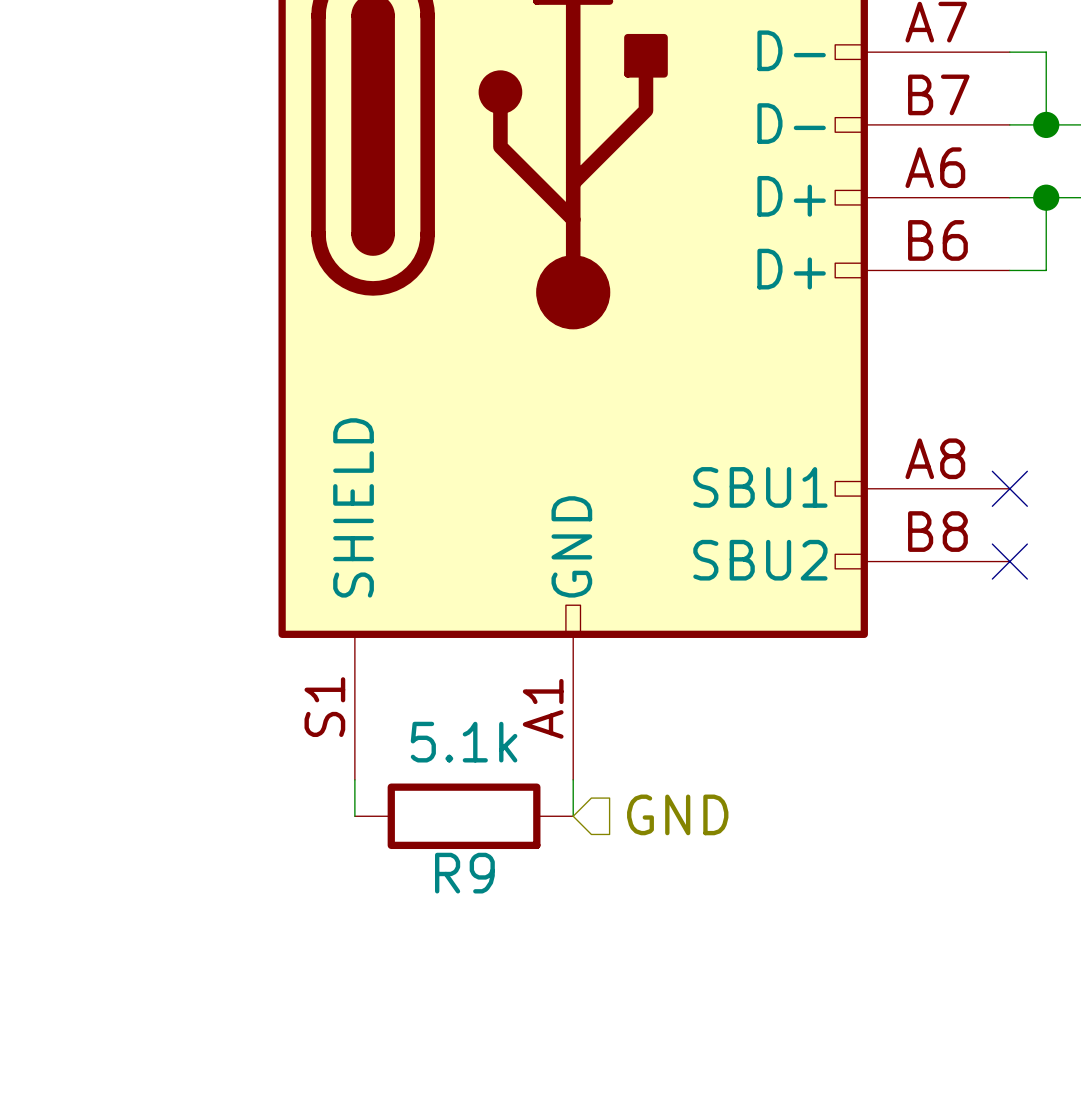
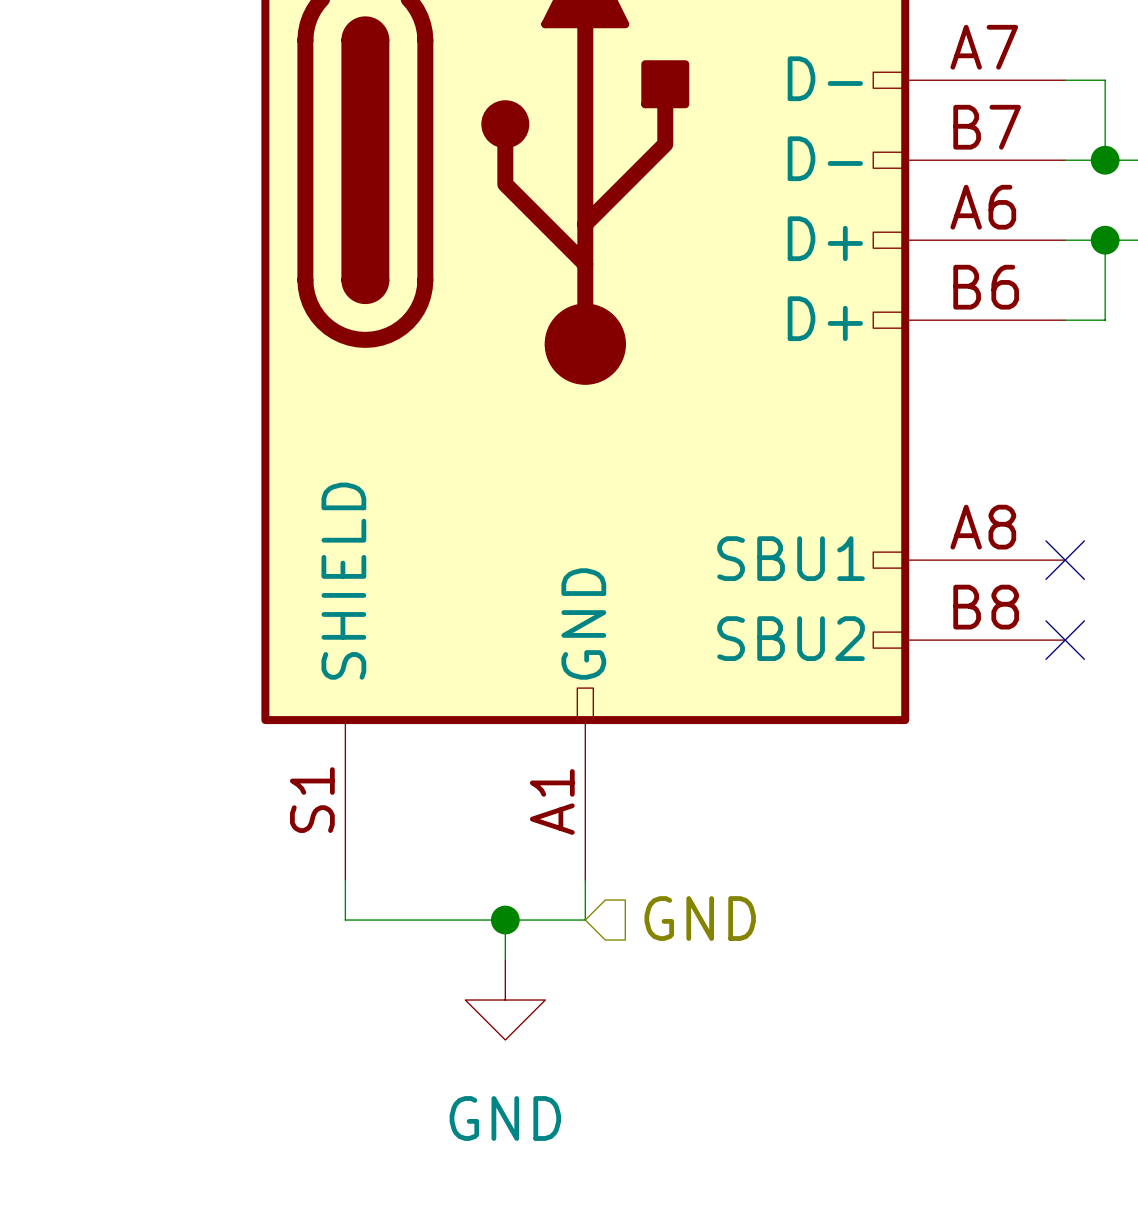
wire: none -> (345, 920) (585, 920)
R9: 5.1k (464, 816) -> none
wire: none -> (505, 920) (505, 960)
junction: none -> (505, 920)
power symbol: none -> GND (505, 1000)

